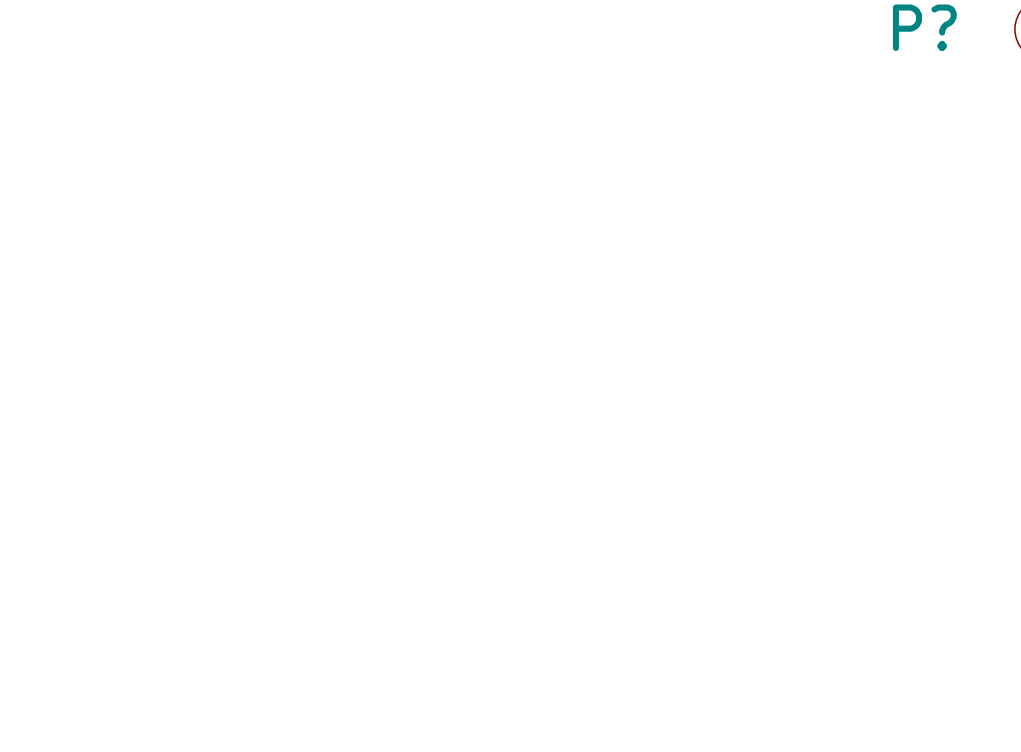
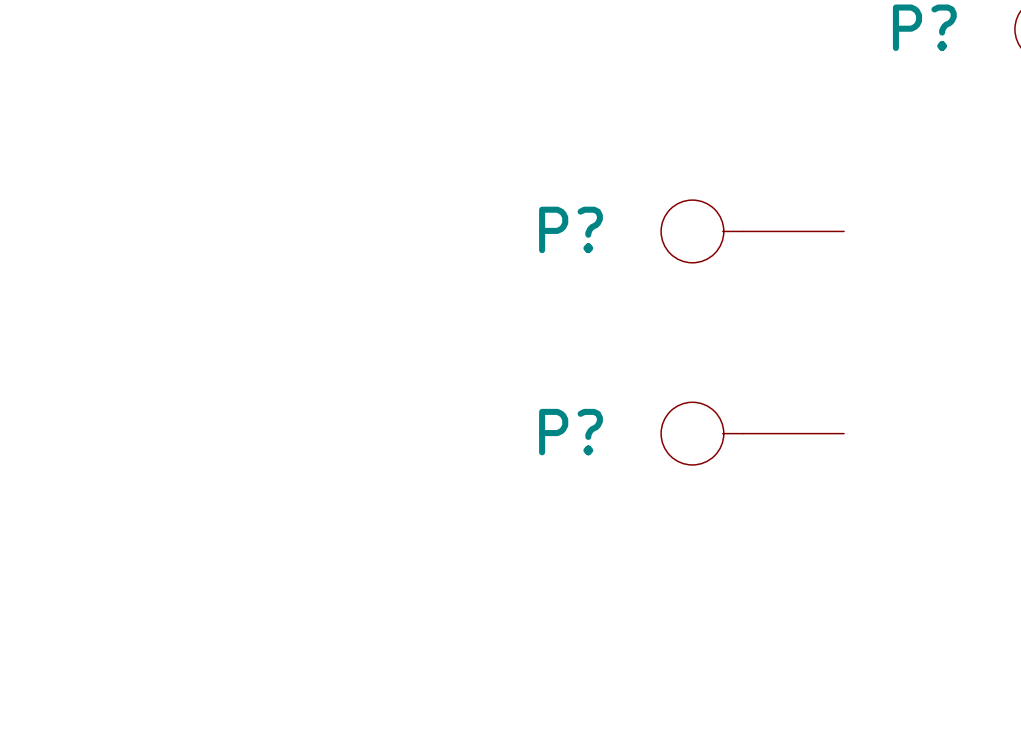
P?: none -> (752, 231)
P?: none -> (752, 433)

